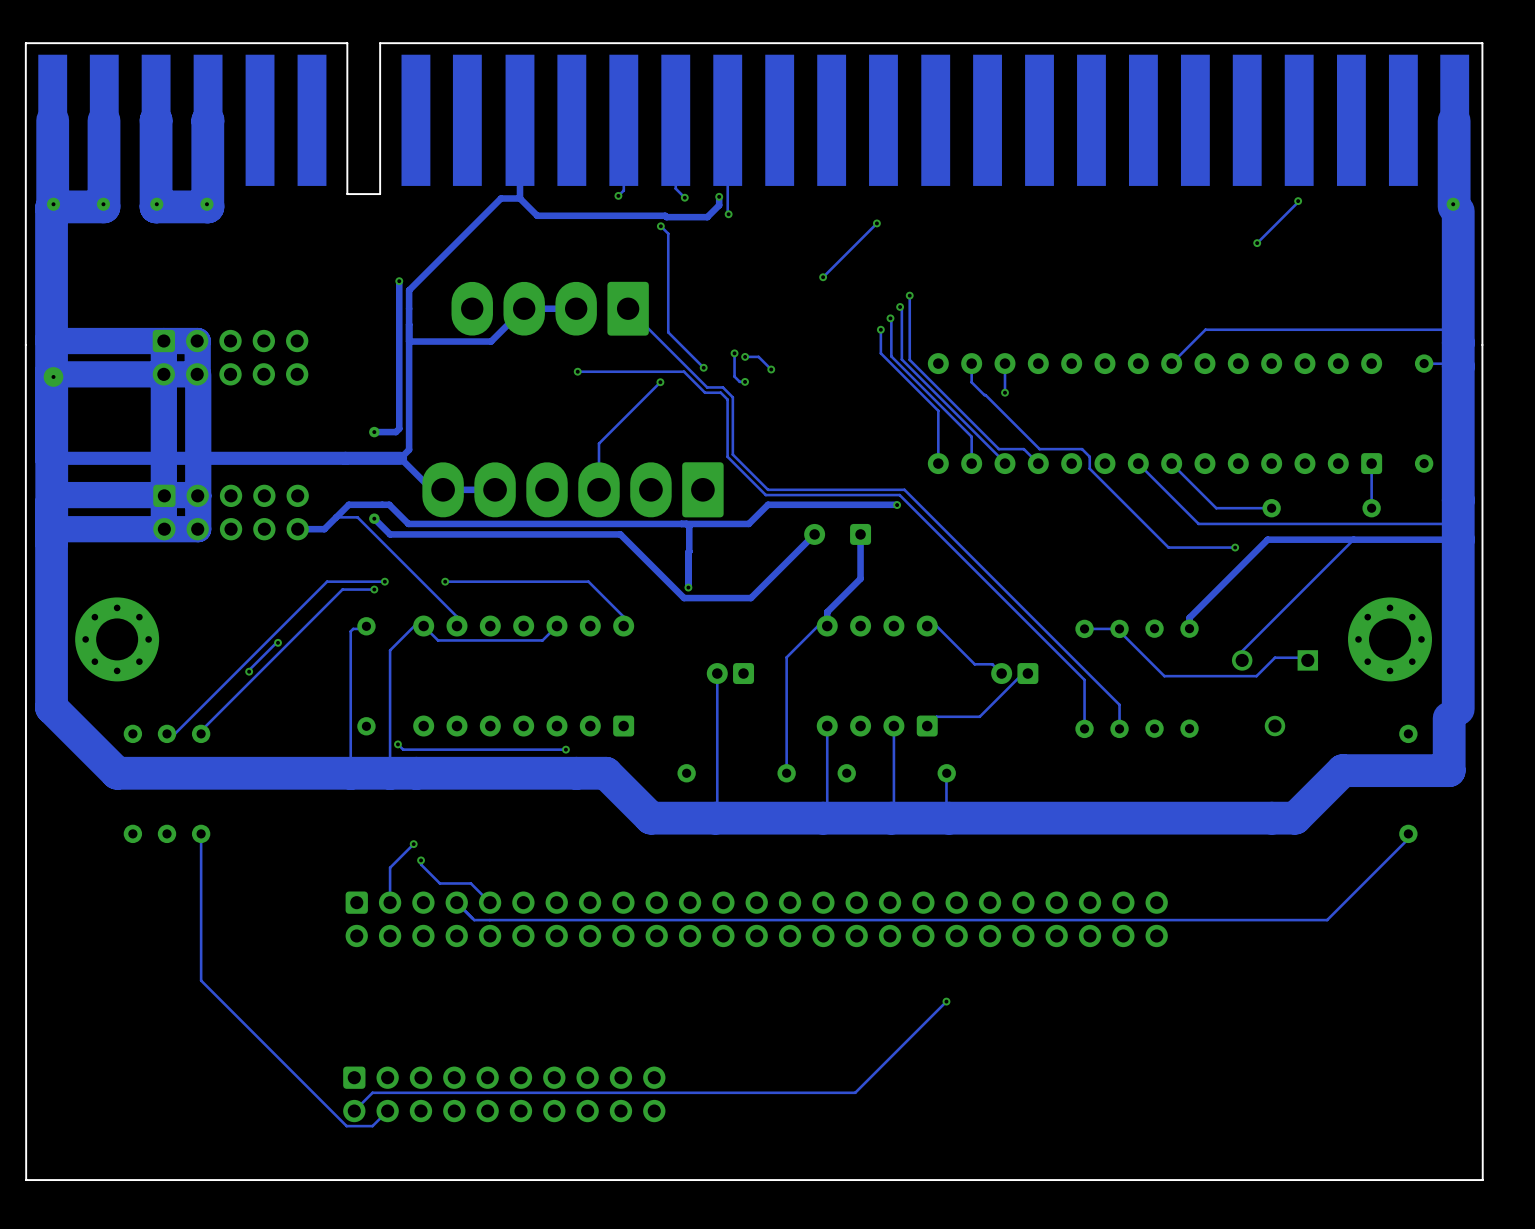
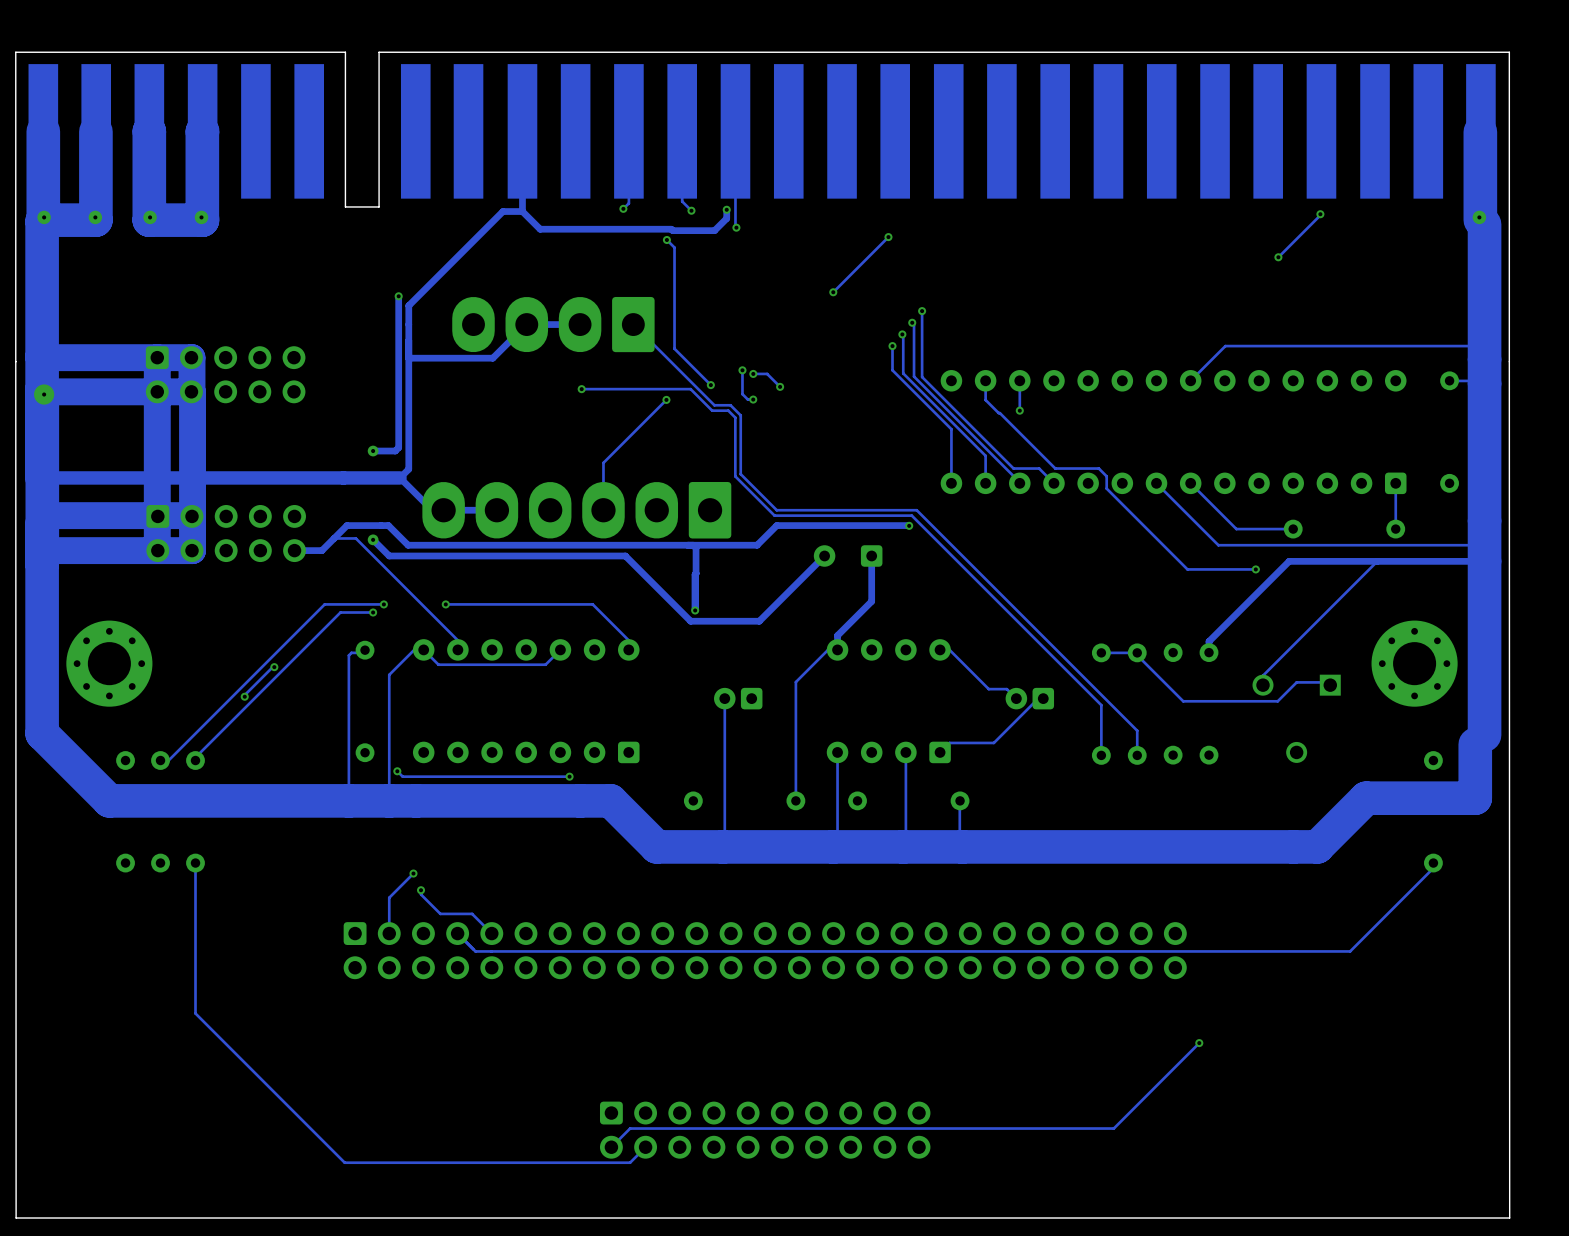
track: (946, 1001) (855, 1092) -> (1199, 1043) (1113, 1128) (866, 1128)
via: (946, 1001) -> none
via: none -> (1199, 1043)
track: (624, 1092) (372, 1092) (354, 1111) -> (630, 1128) (611, 1147)
part position: (504, 1094) -> (765, 1130)
track: (387, 1111) (372, 1126) -> (645, 1147) (630, 1162) (371, 1162)

